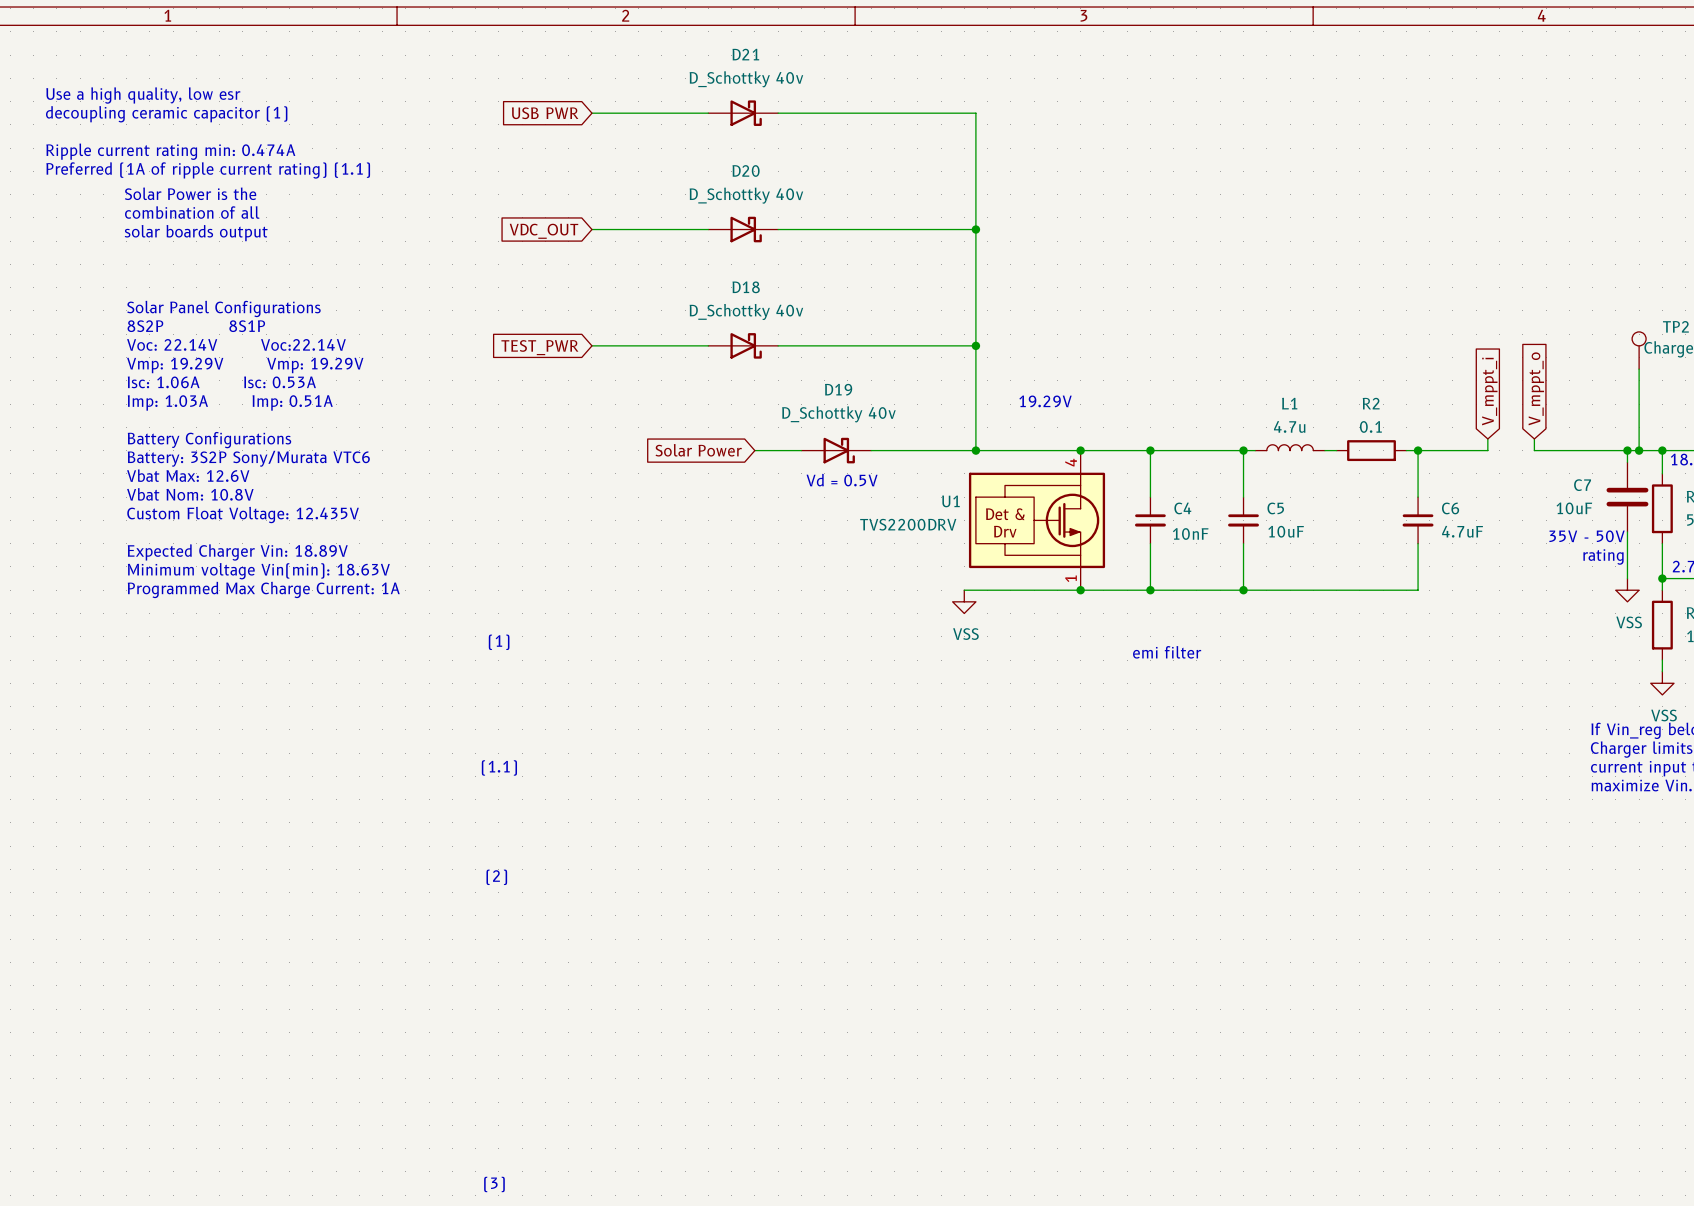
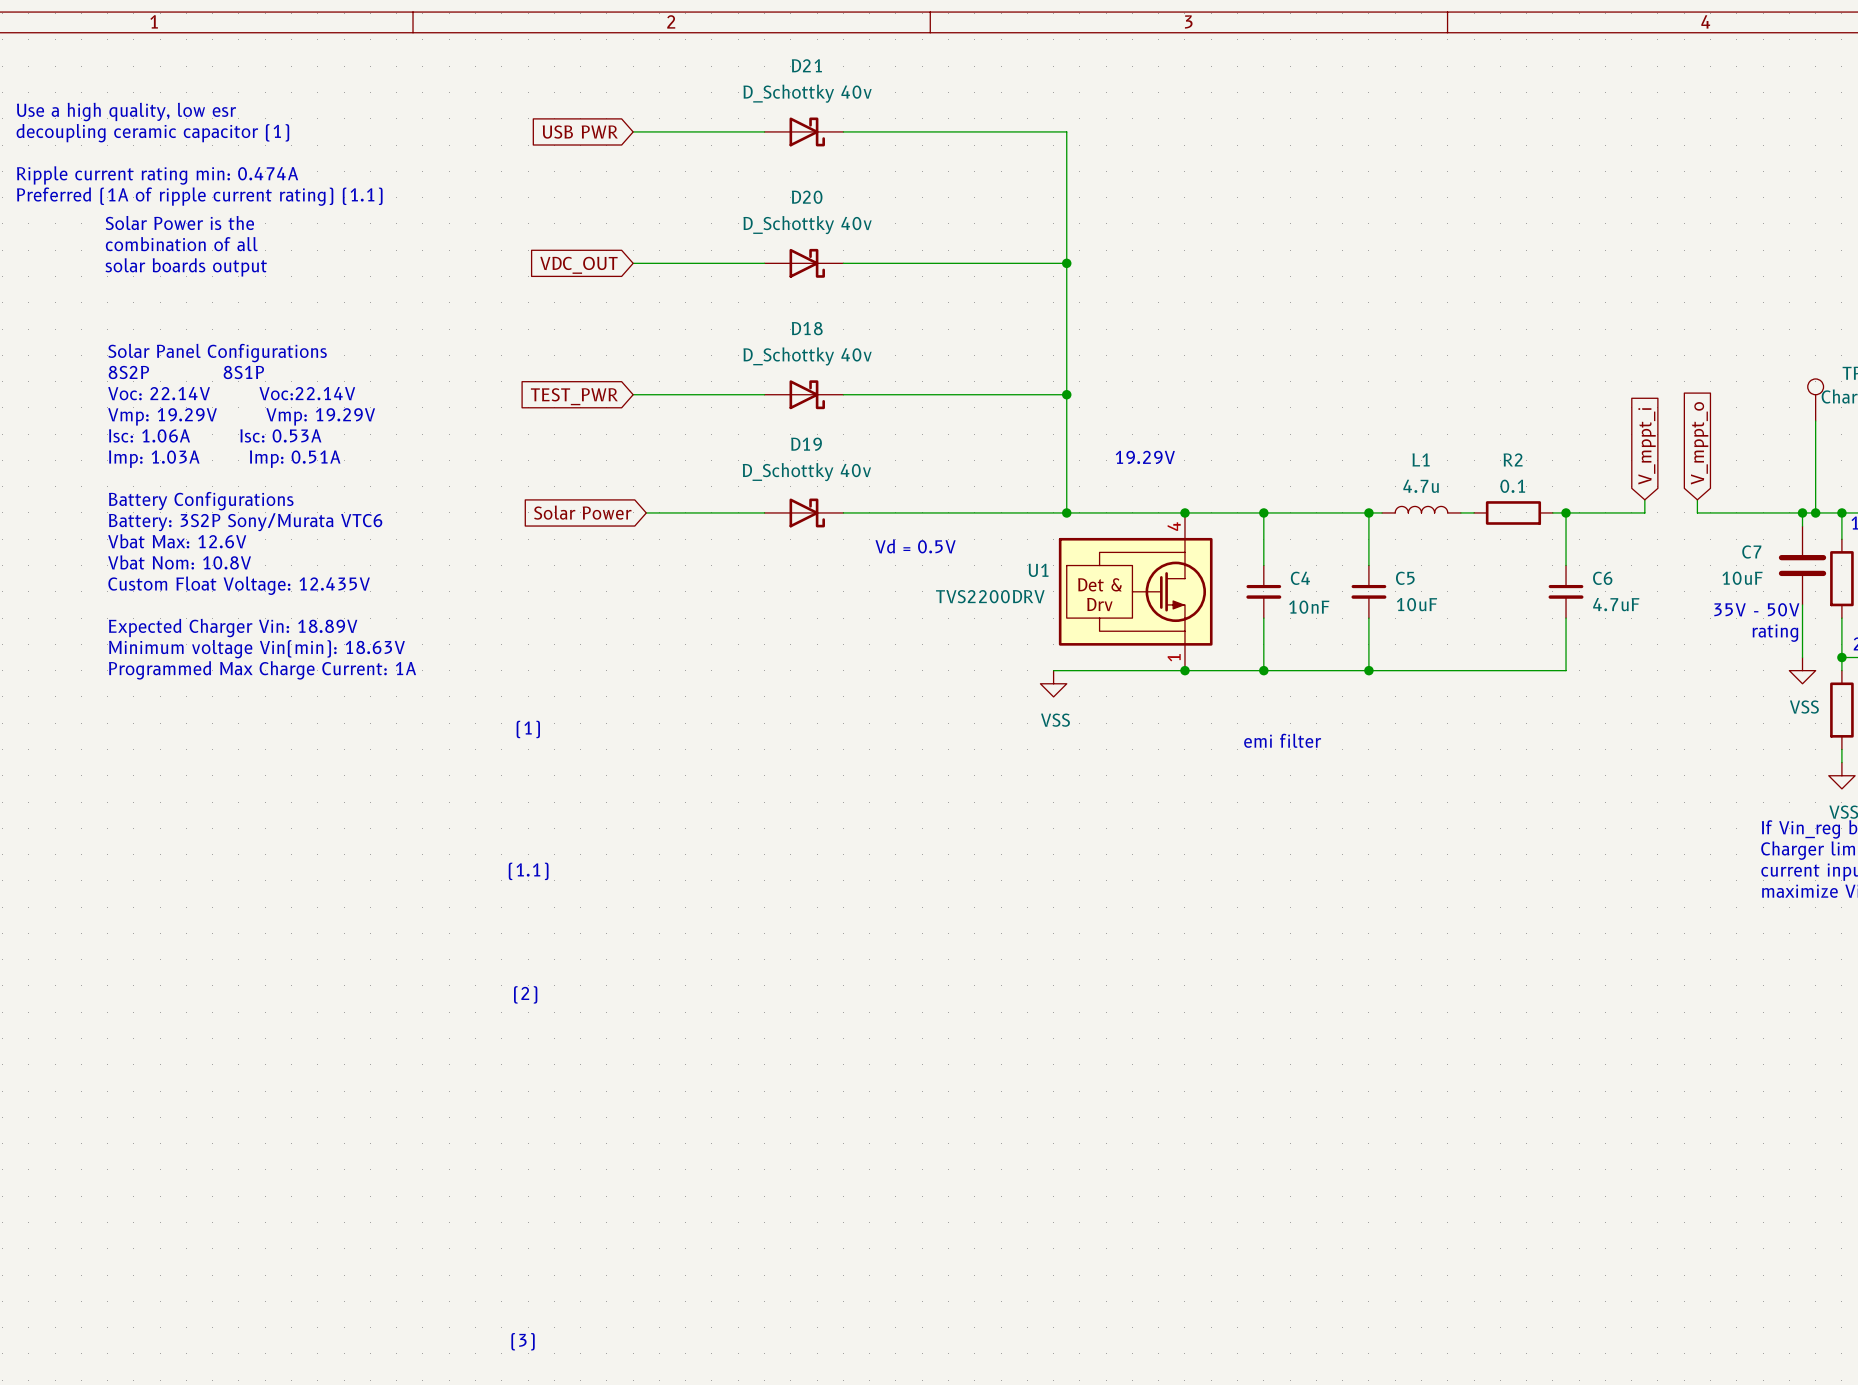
wire: none -> (646, 512) (764, 512)
global label position: Solar Power (698, 450) -> Solar Power (582, 512)
D19 position: (836, 450) -> (803, 512)

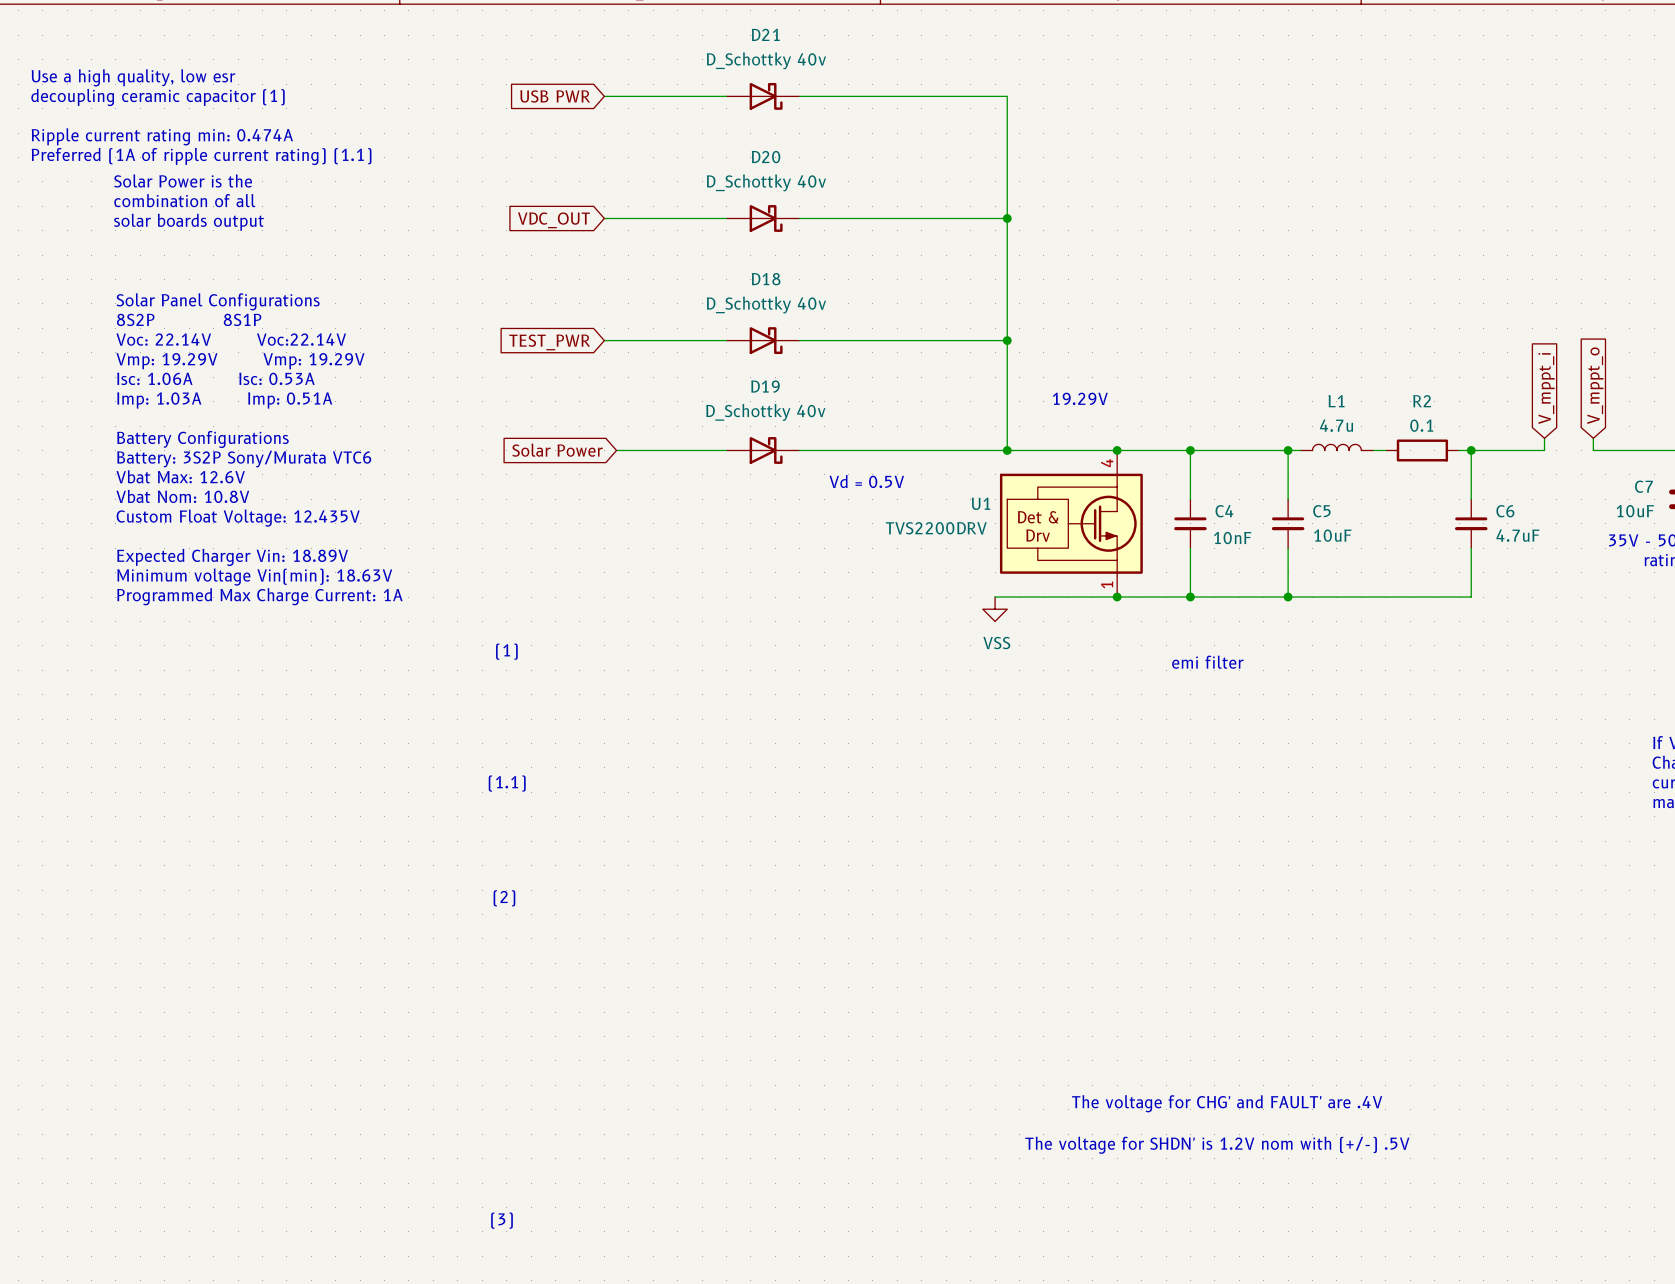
text: none -> The voltage for CHG' and FAULT' are .4V (1227, 1103)
text: none -> The voltage for SHDN' is 1.2V nom with (+/-) .5V (1217, 1145)

